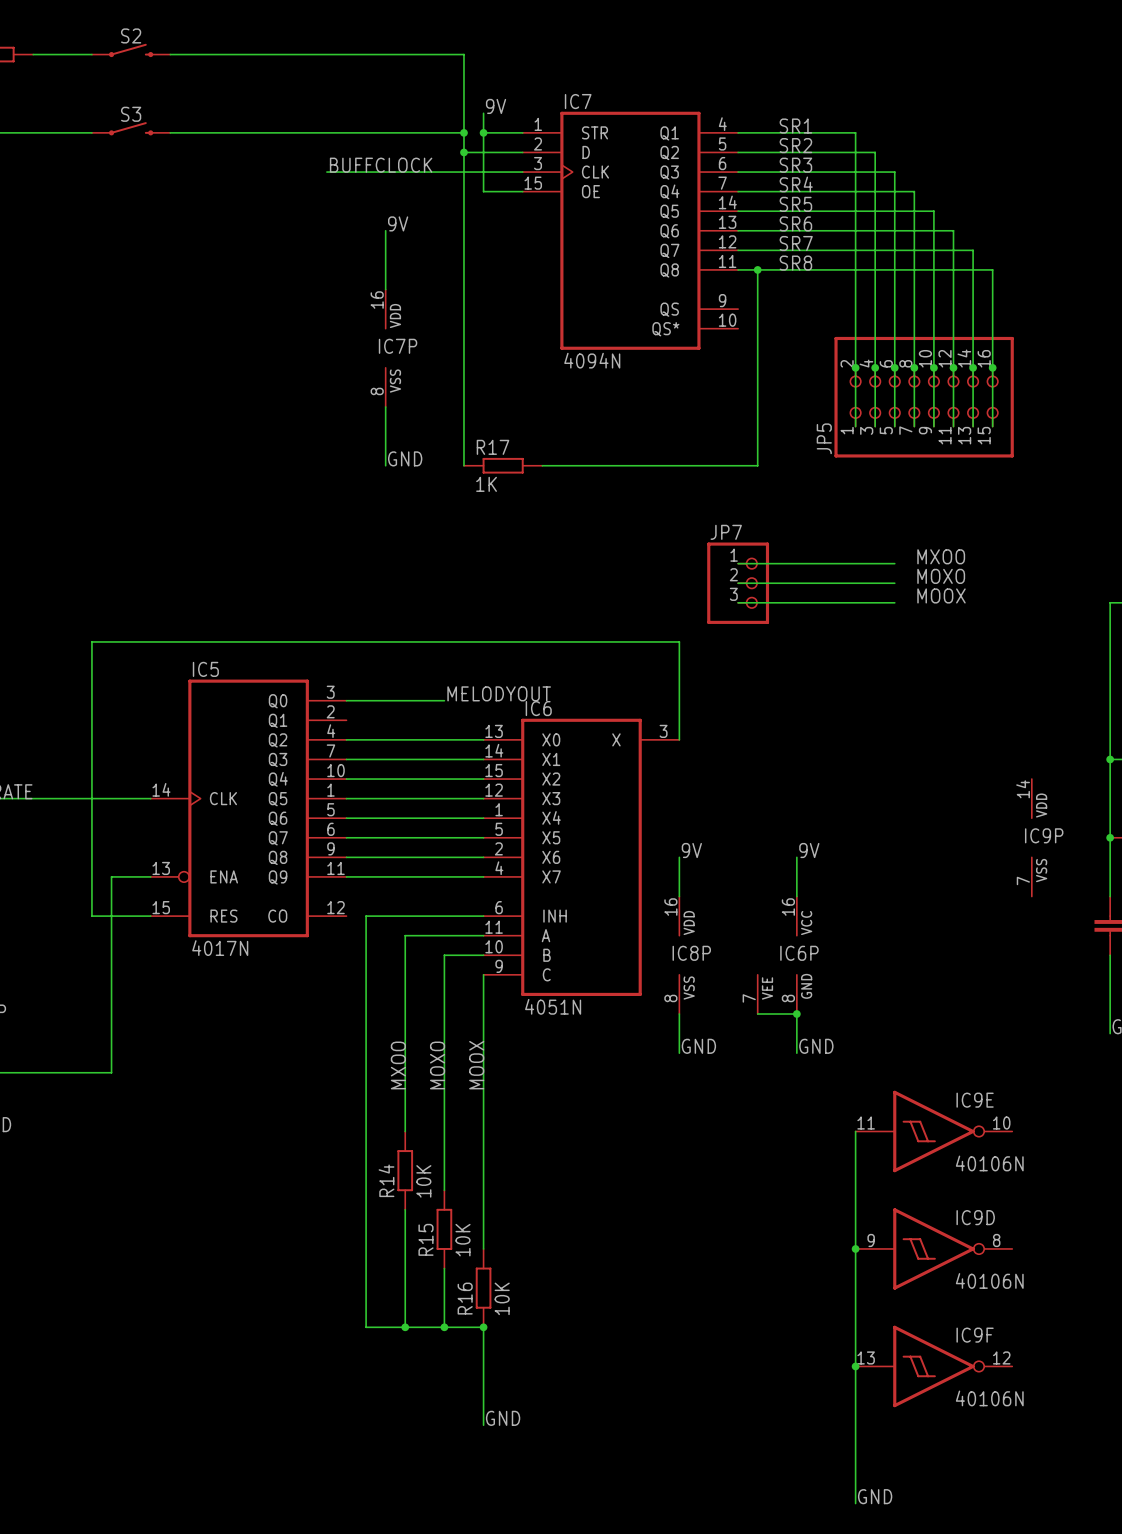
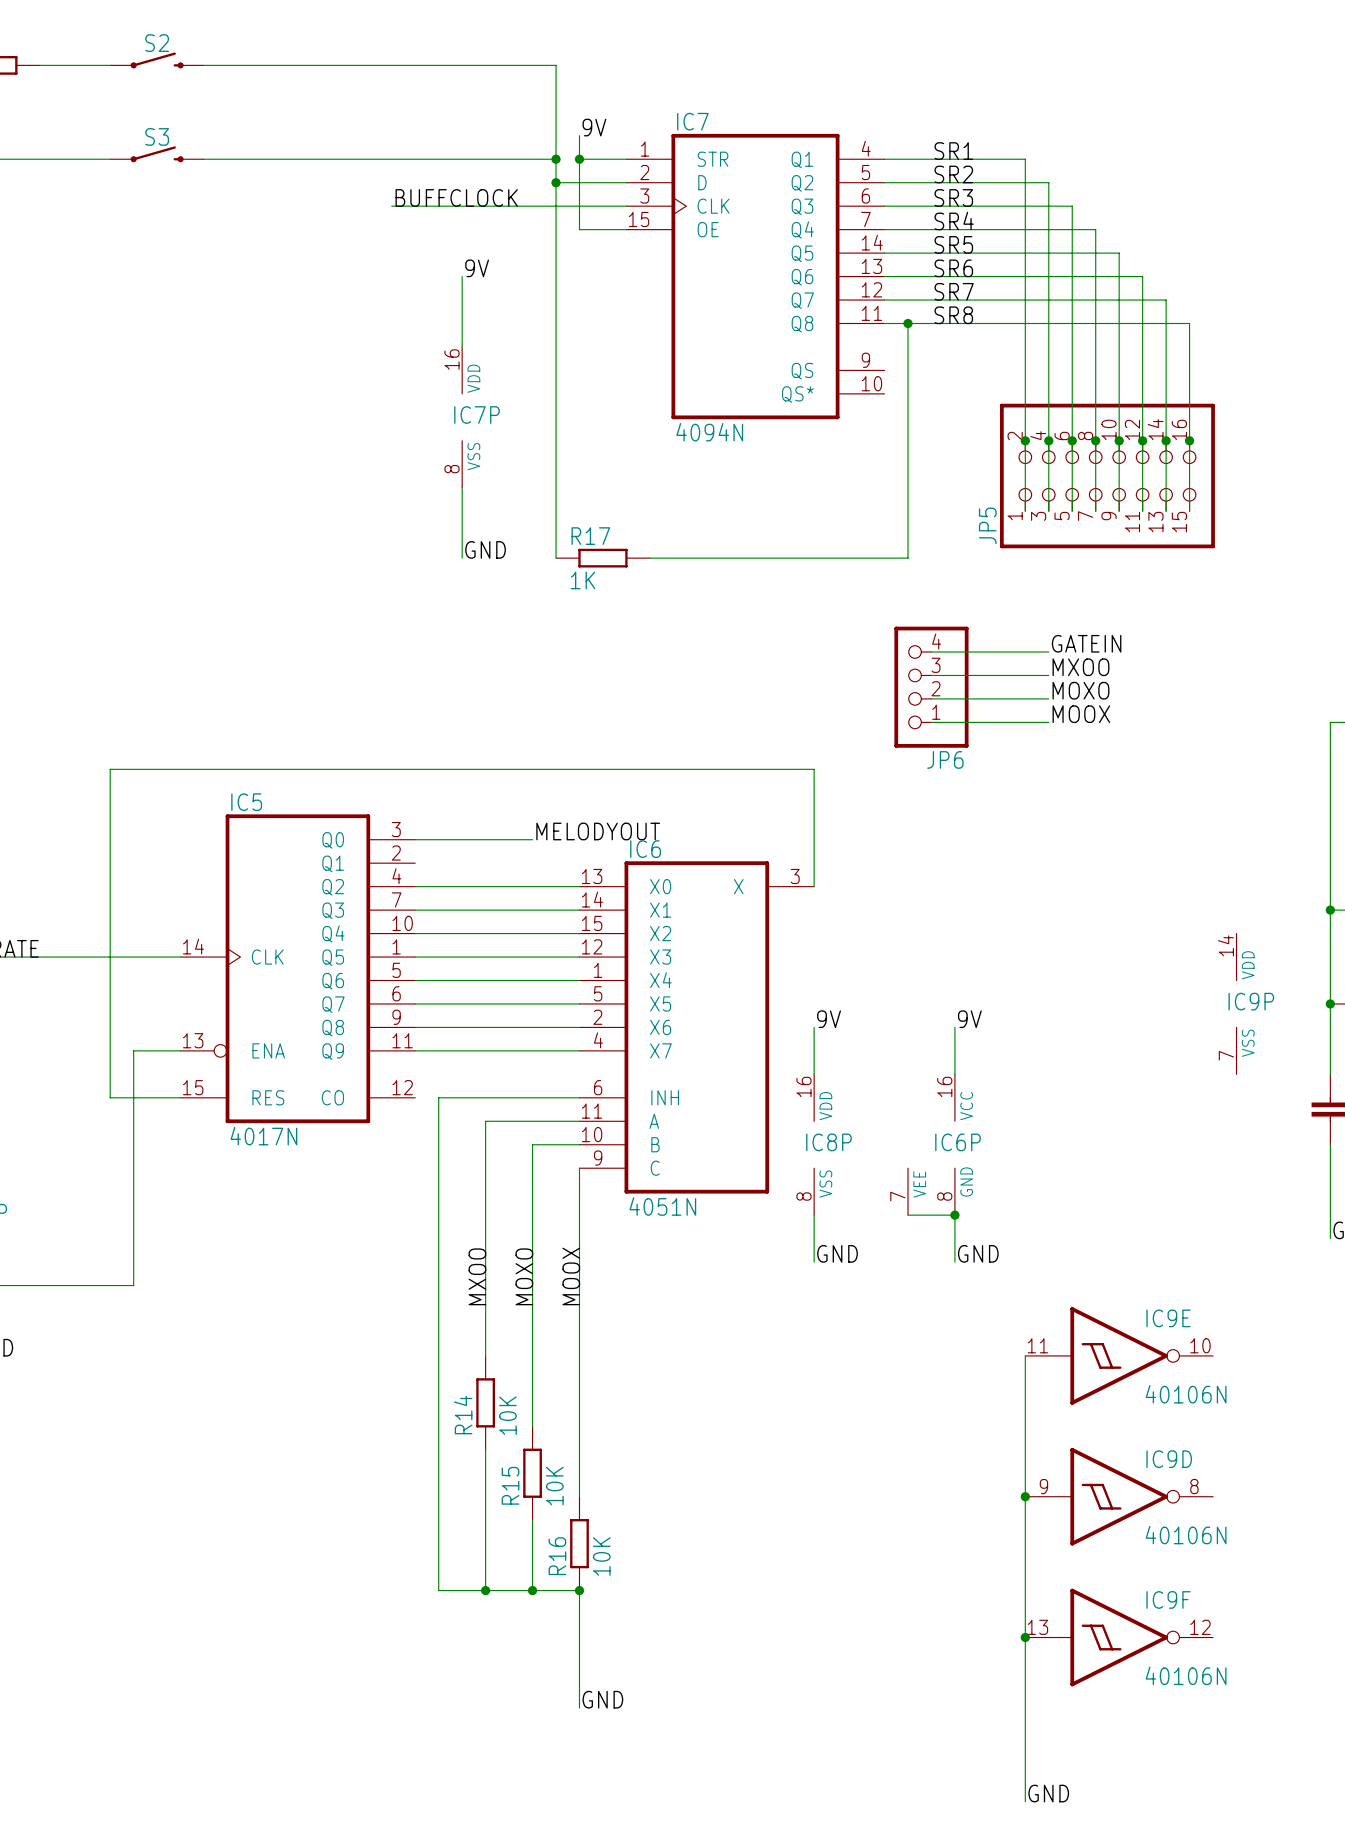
label: none -> GATEIN (1086, 643)
wire: none -> (931, 651) (1048, 651)
label position: MXOO (941, 556) -> MXOO (1080, 667)
wire: (738, 563) (777, 563) -> none
wire: (875, 563) (894, 563) -> none
JP6: none -> (931, 687)
label position: MOXO (941, 576) -> MOXO (1080, 690)
wire: (738, 583) (777, 583) -> none
JP7: (738, 583) -> none
wire: (875, 583) (894, 583) -> none
label position: MOOX (941, 595) -> MOOX (1081, 714)
wire: (738, 602) (777, 602) -> none
wire: (875, 602) (894, 602) -> none

